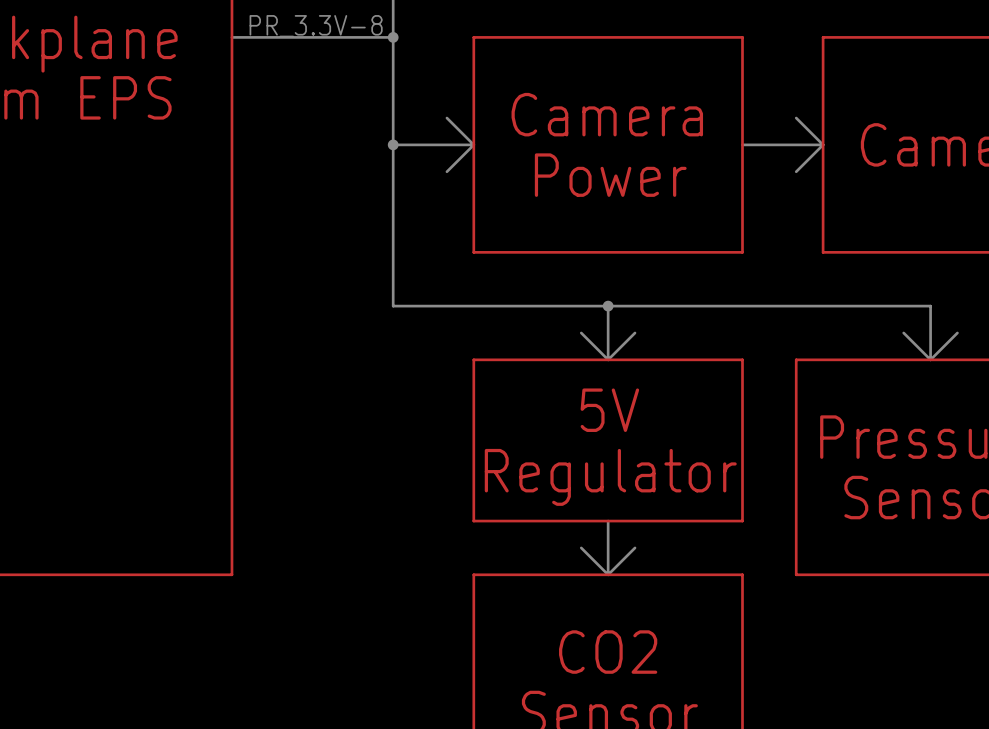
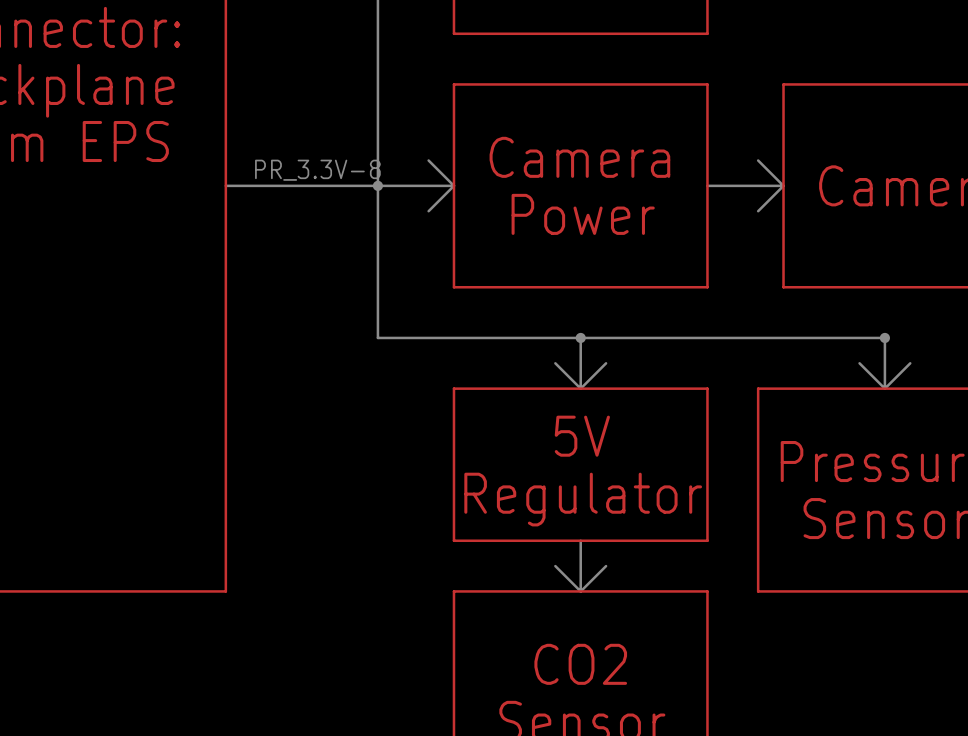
text position: PR_3.3V-8 (316, 26) -> PR_3.3V-8 (317, 170)
line: (231, 37) (393, 37) -> (225, 185) (377, 185)
part: (393, 37) -> none
part: none -> (884, 337)

